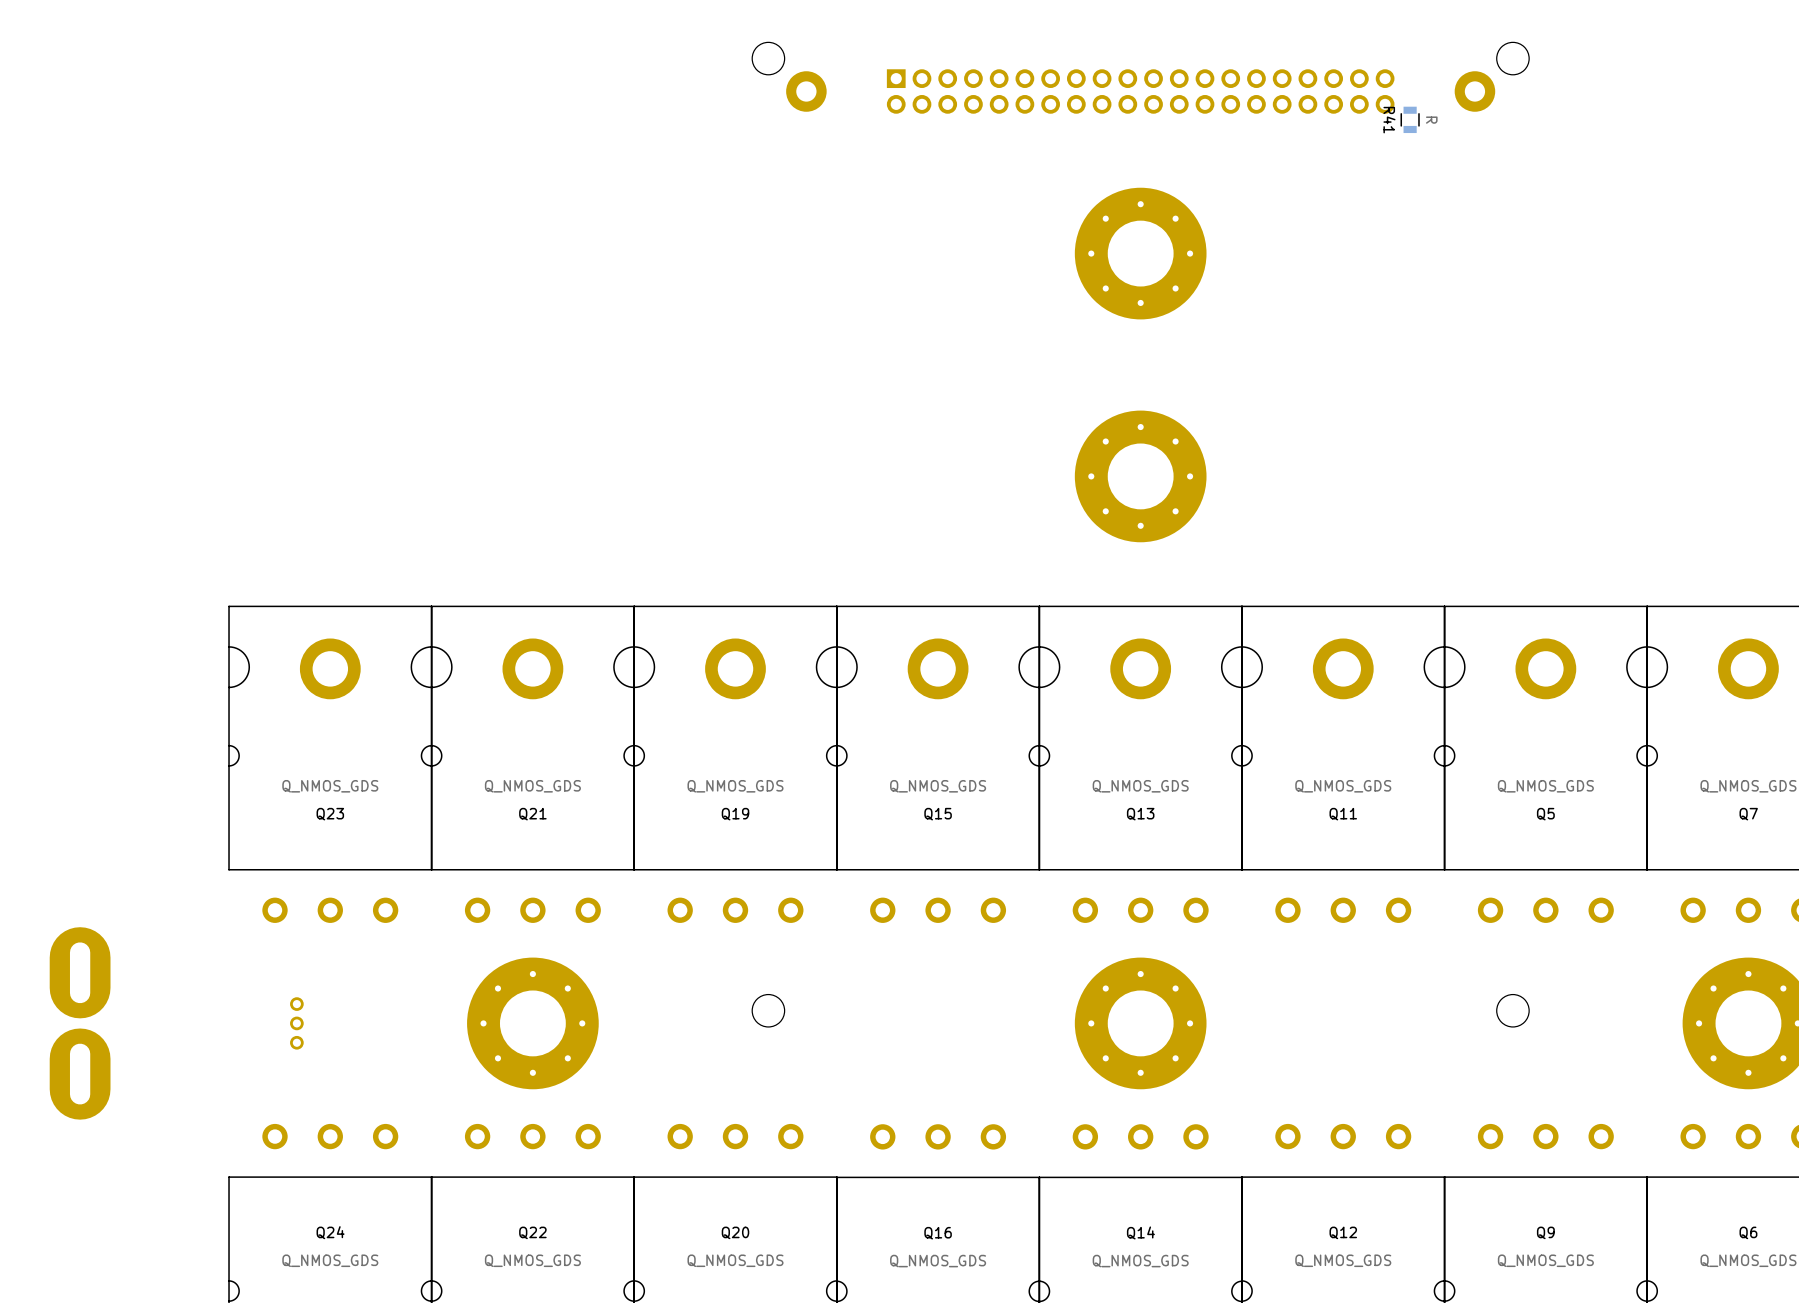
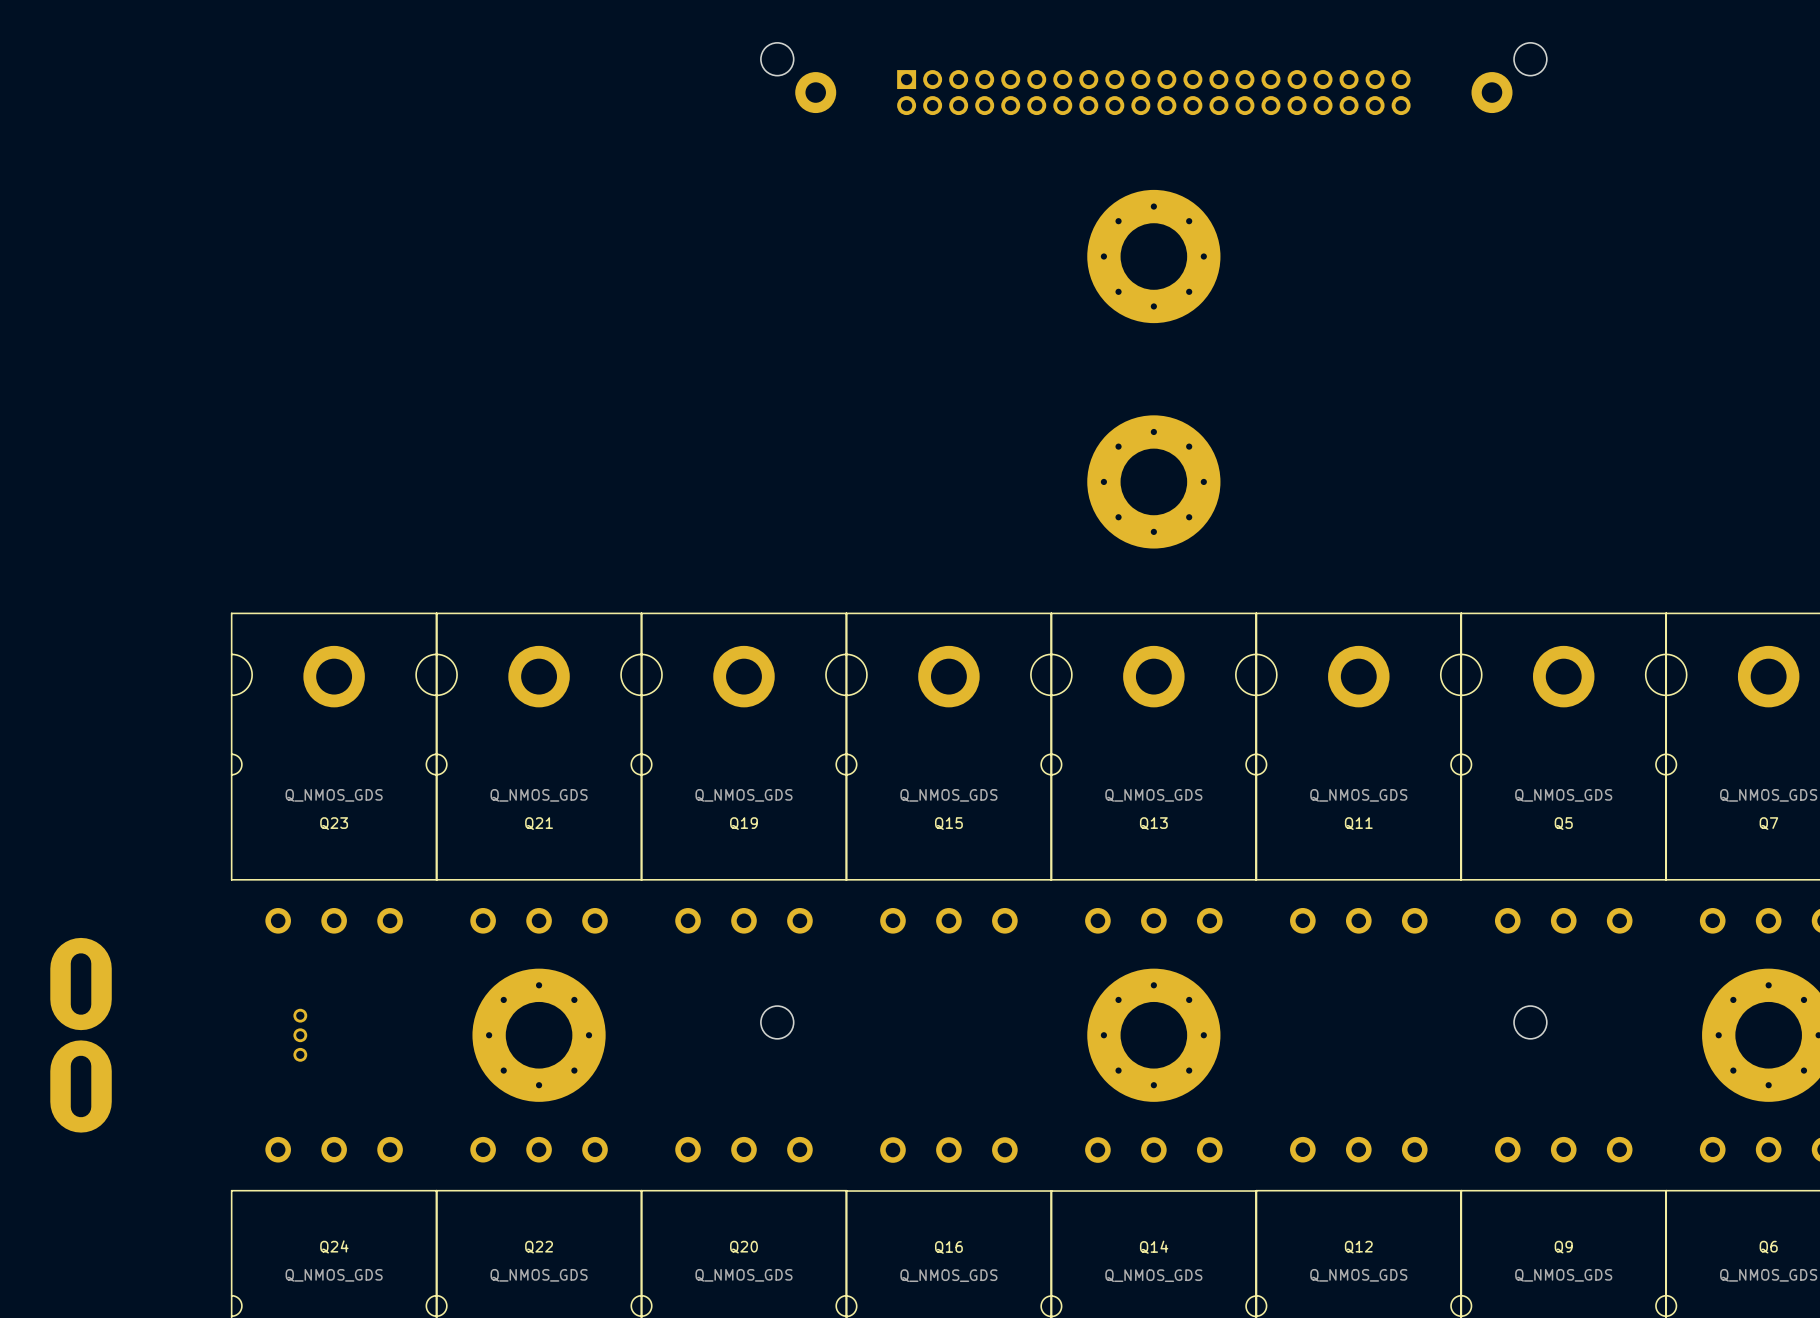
R41: R (1410, 119) -> none

